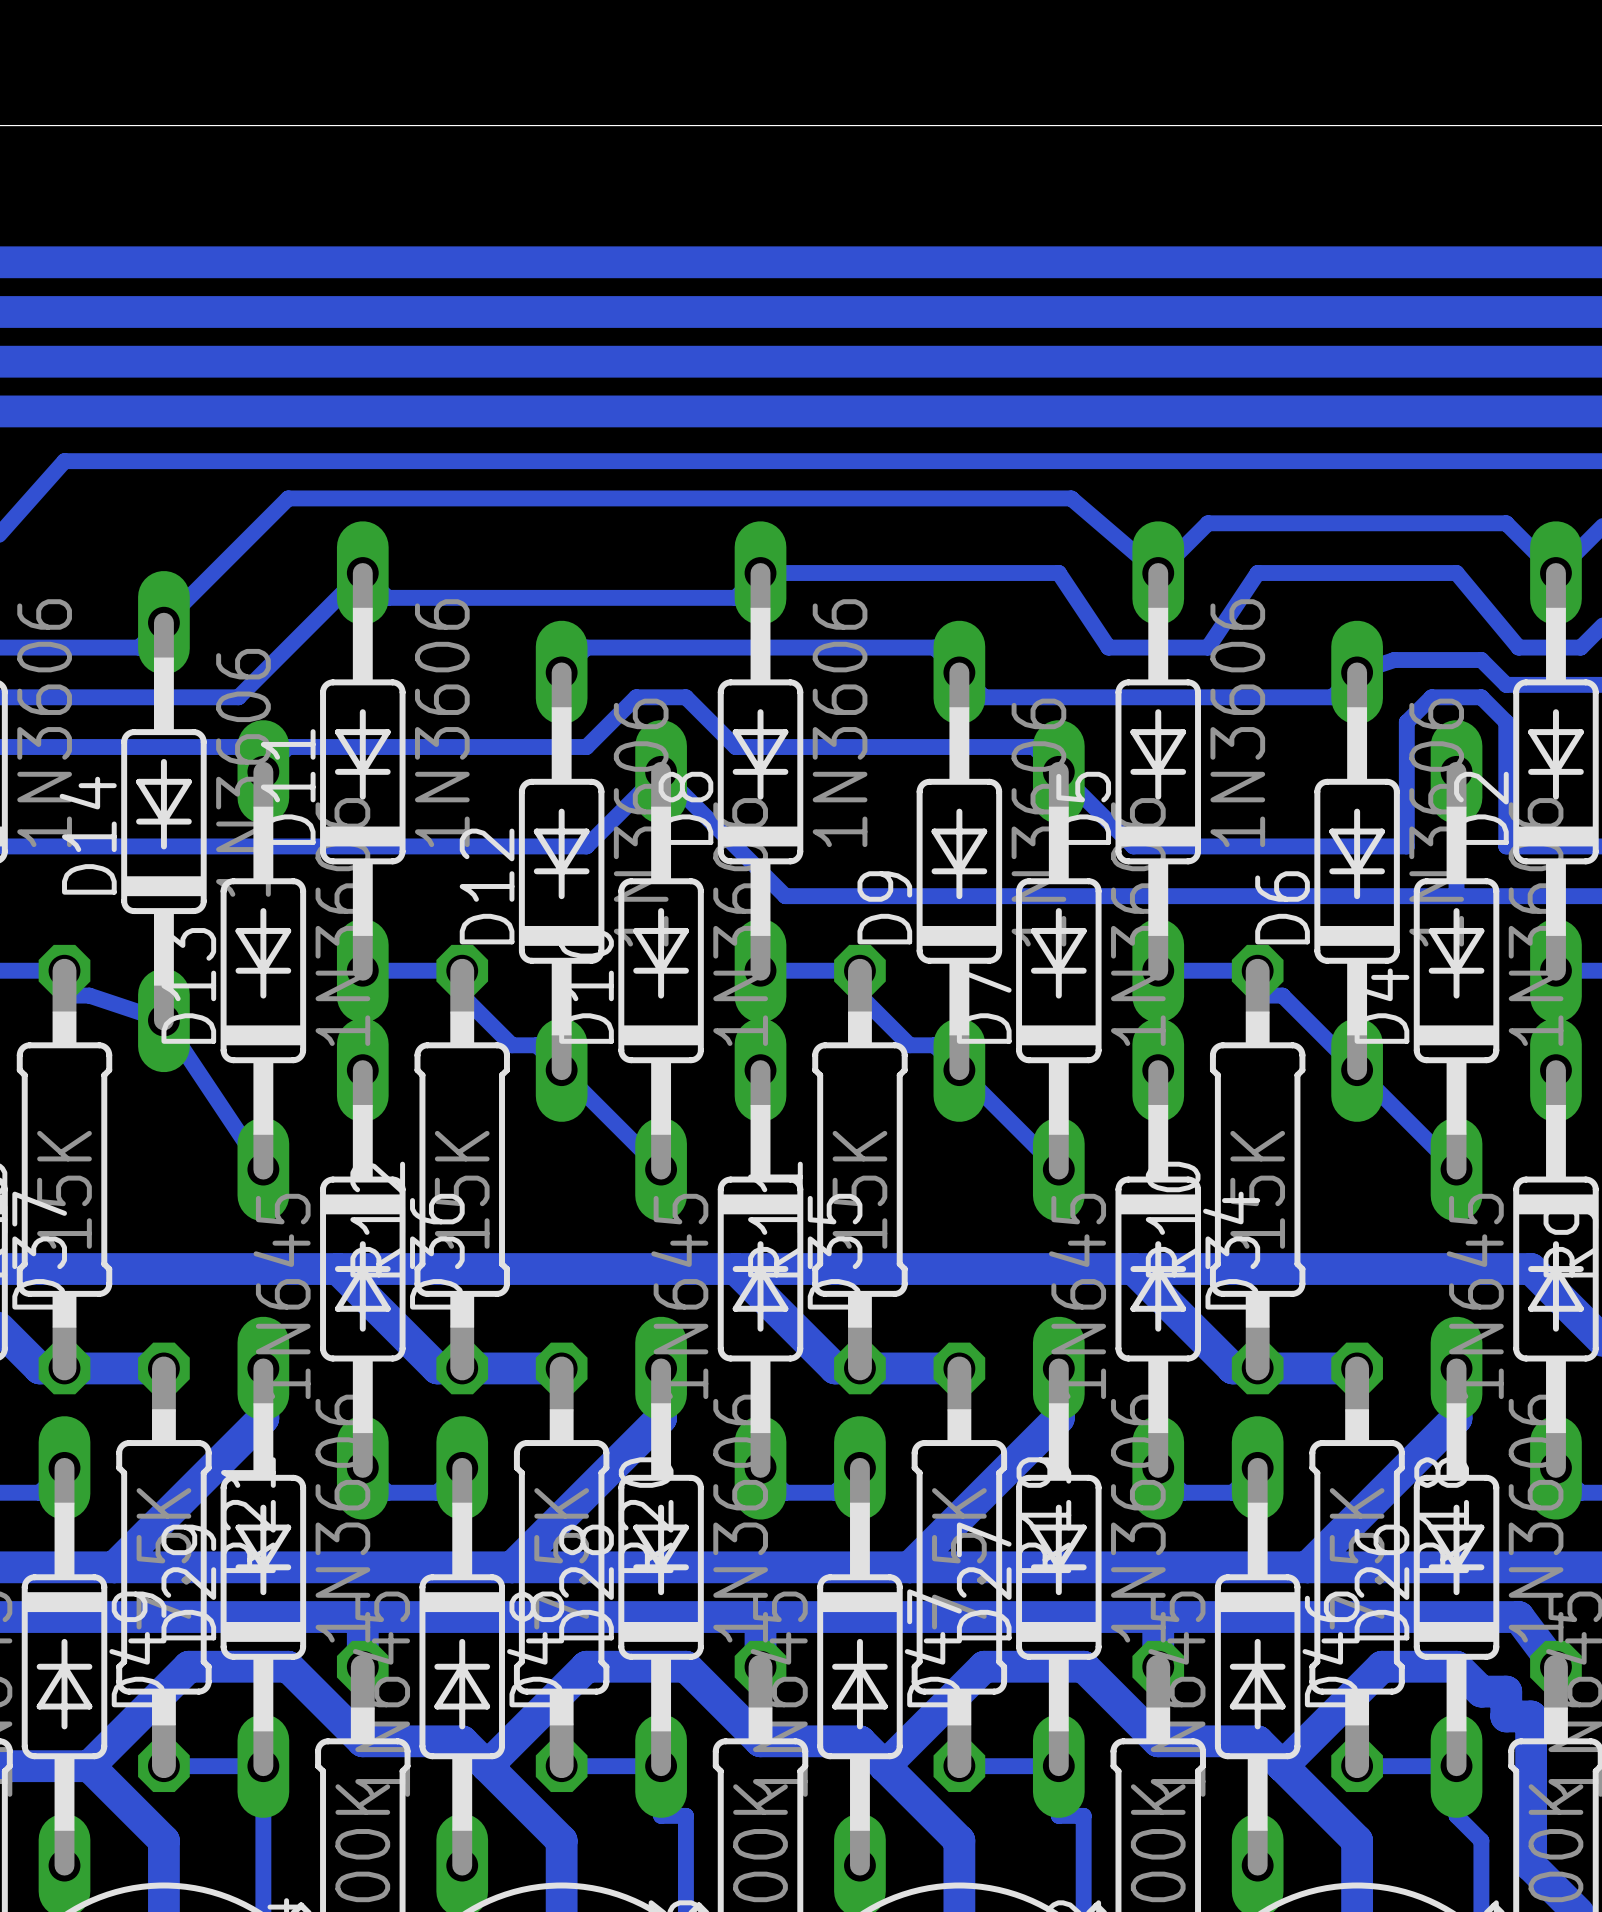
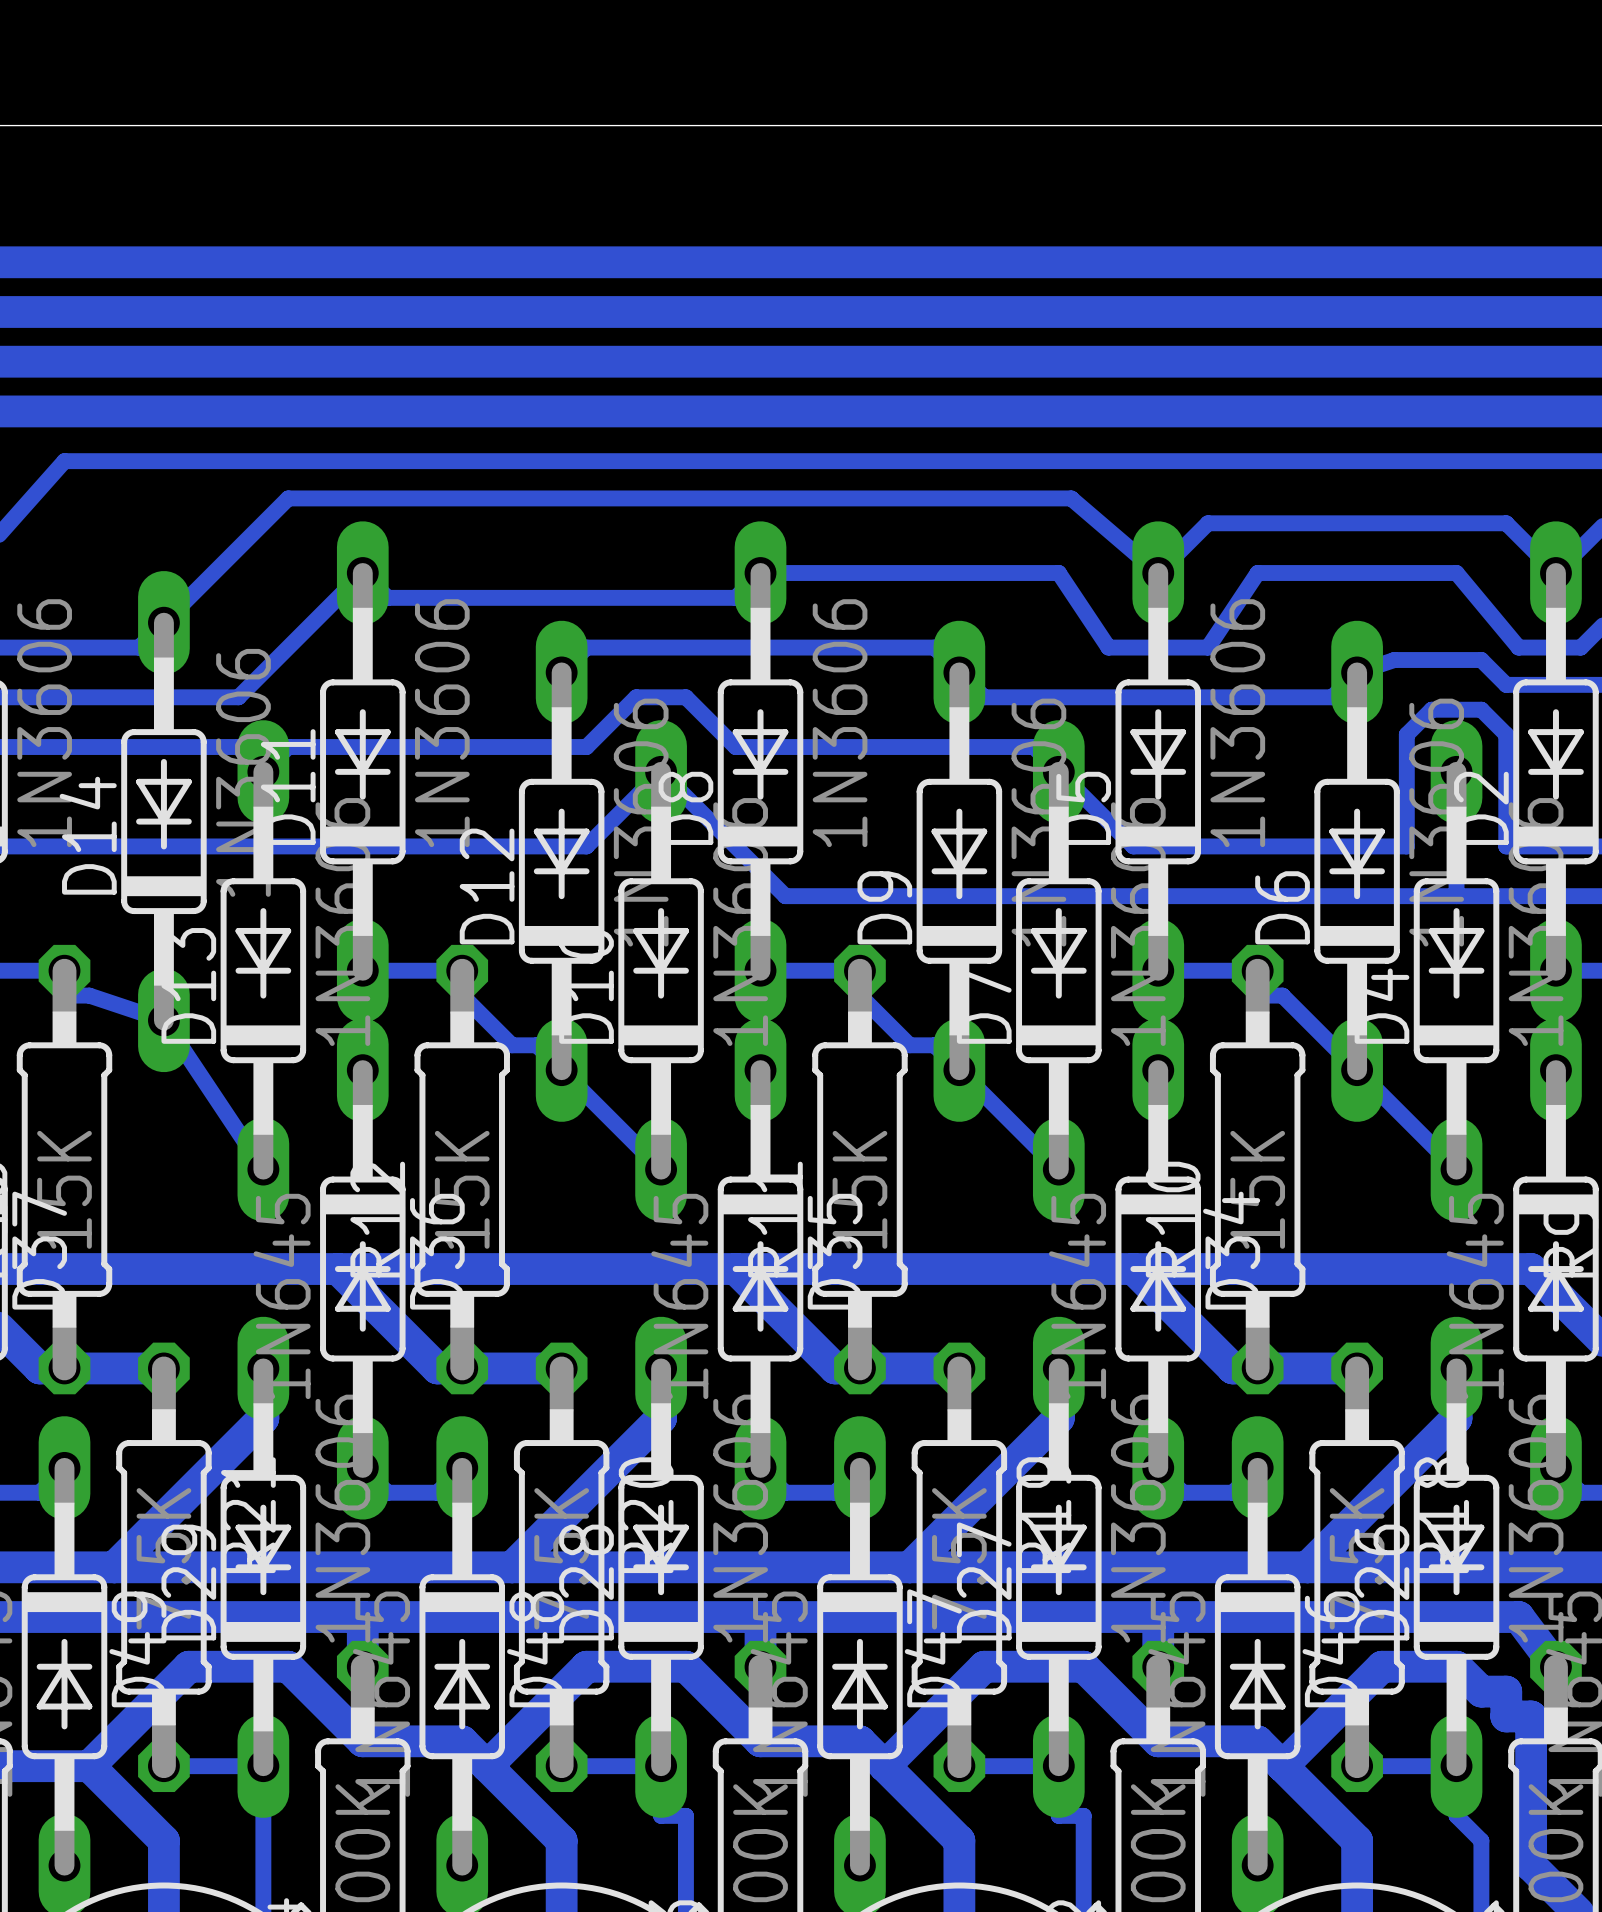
bottom track: (1406, 734) (1406, 722) (1431, 697) (1481, 697) (1506, 722) (1506, 734) -> (1406, 734) (1431, 709) (1481, 709) (1506, 734)

